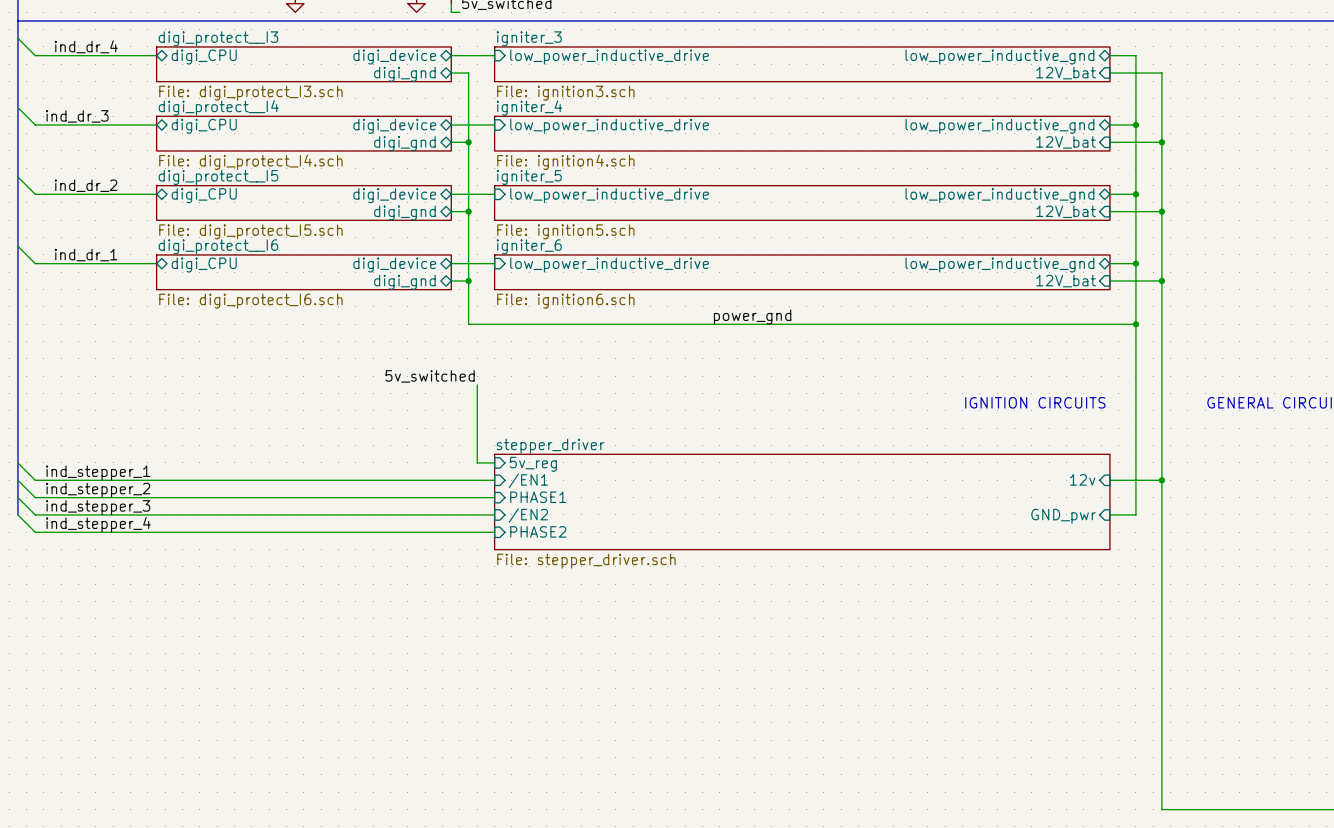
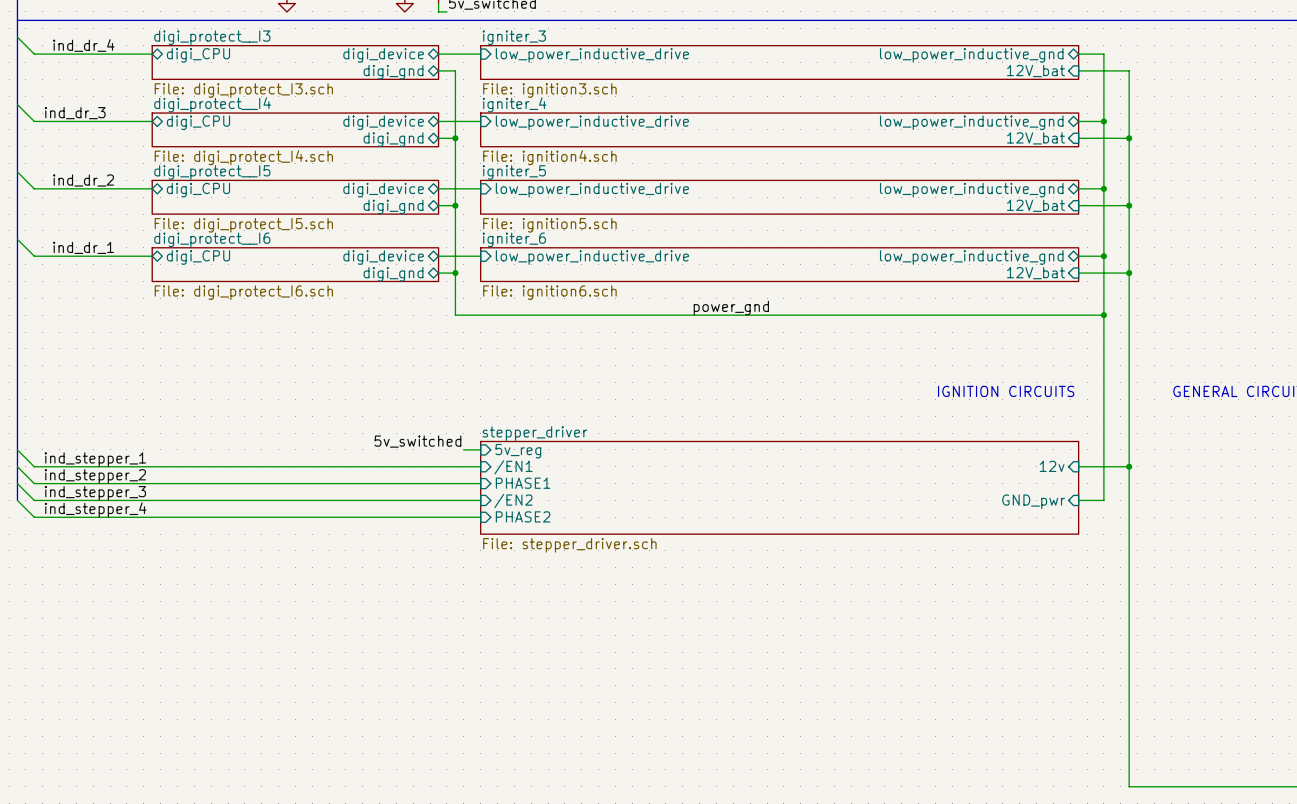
label position: 5v_switched (430, 376) -> 5v_switched (417, 441)
wire: (477, 384) (477, 462) -> none

